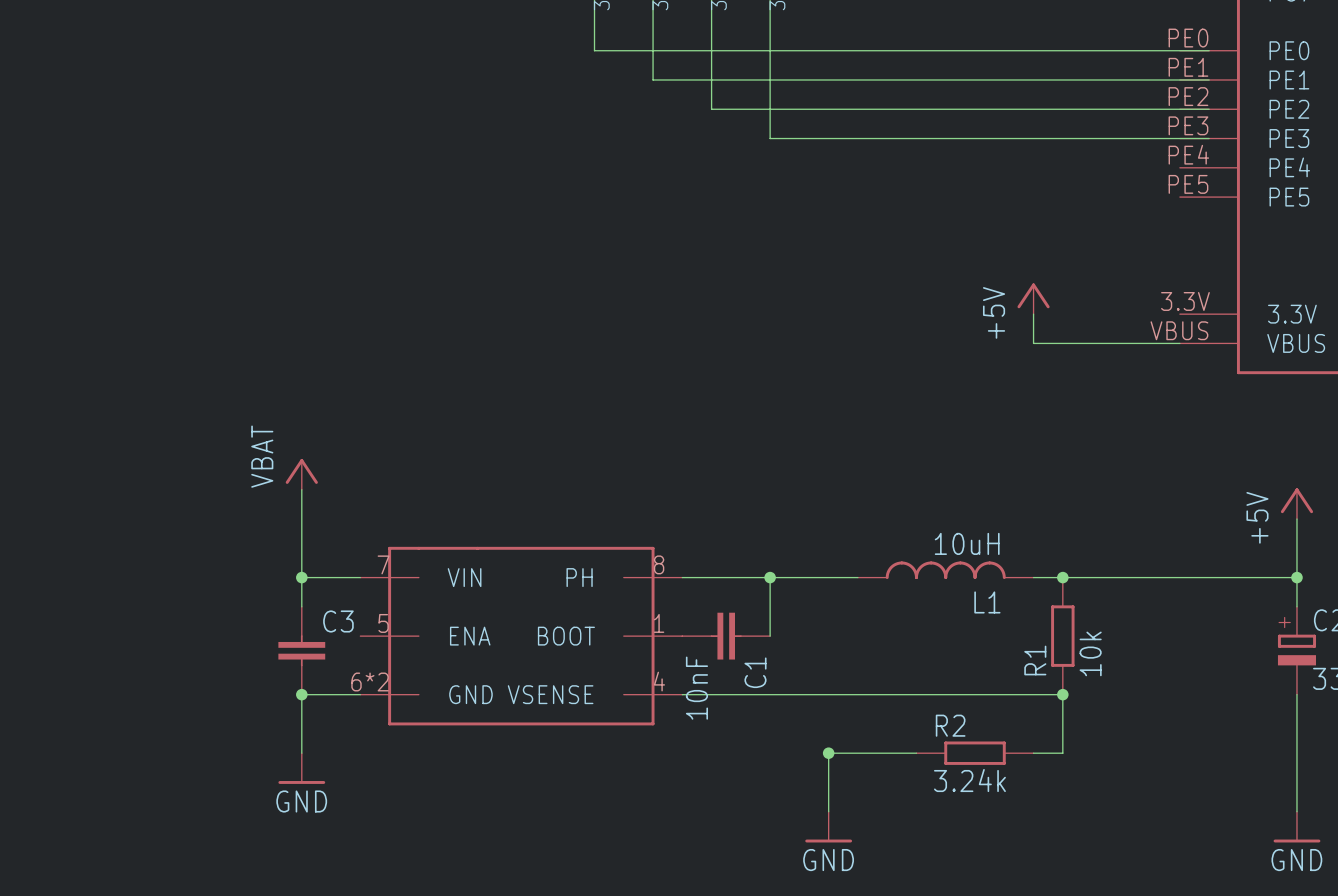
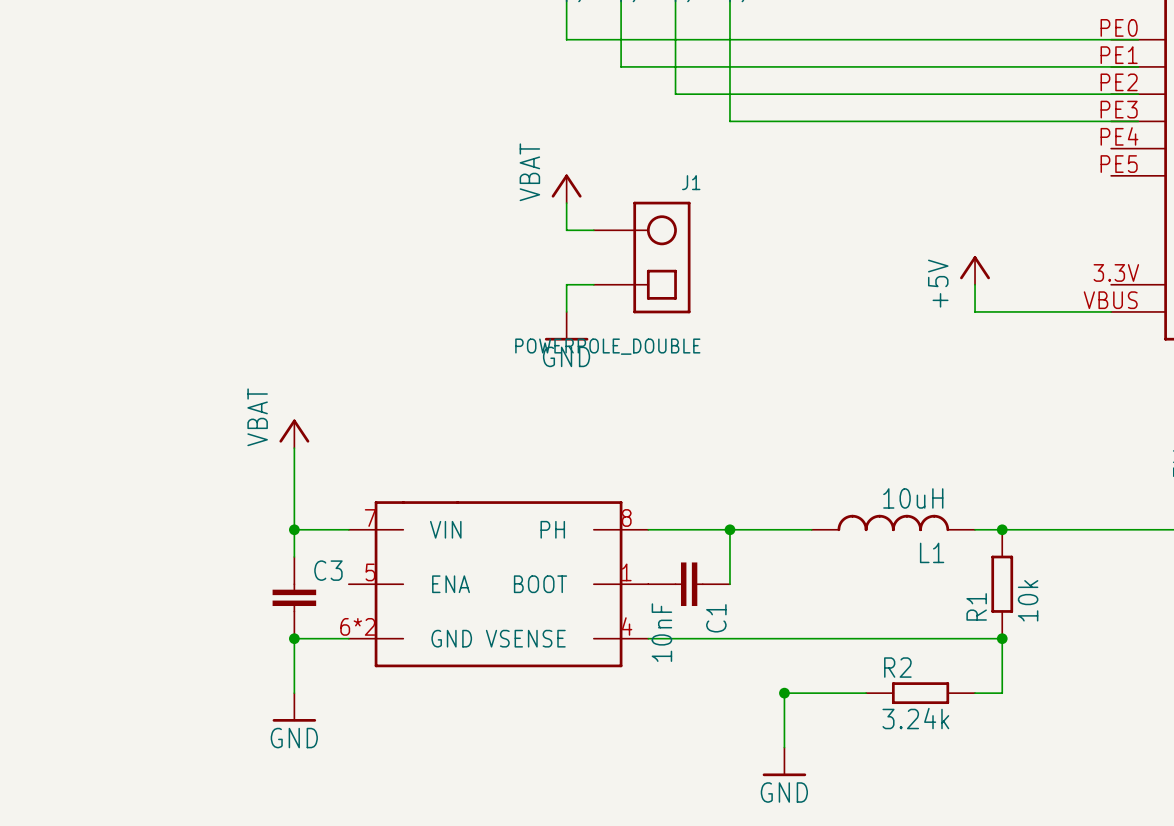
power symbol: none -> VBAT (566, 188)
wire: none -> (566, 203) (566, 230) (593, 230)
J1: none -> POWERPOLE_DOUBLE (642, 257)
wire: none -> (593, 284) (566, 284) (566, 311)
power symbol: none -> GND (566, 326)

